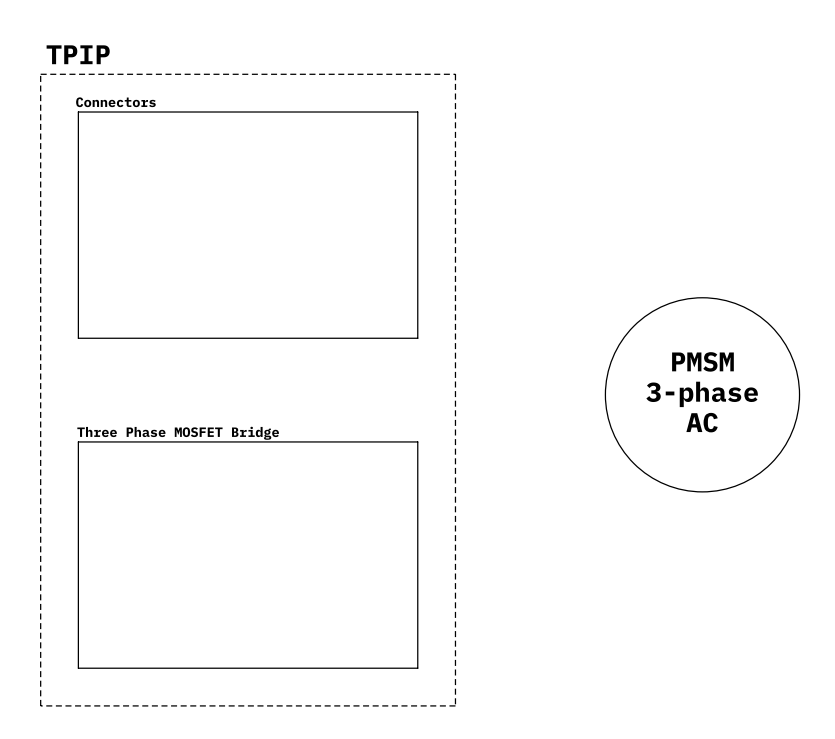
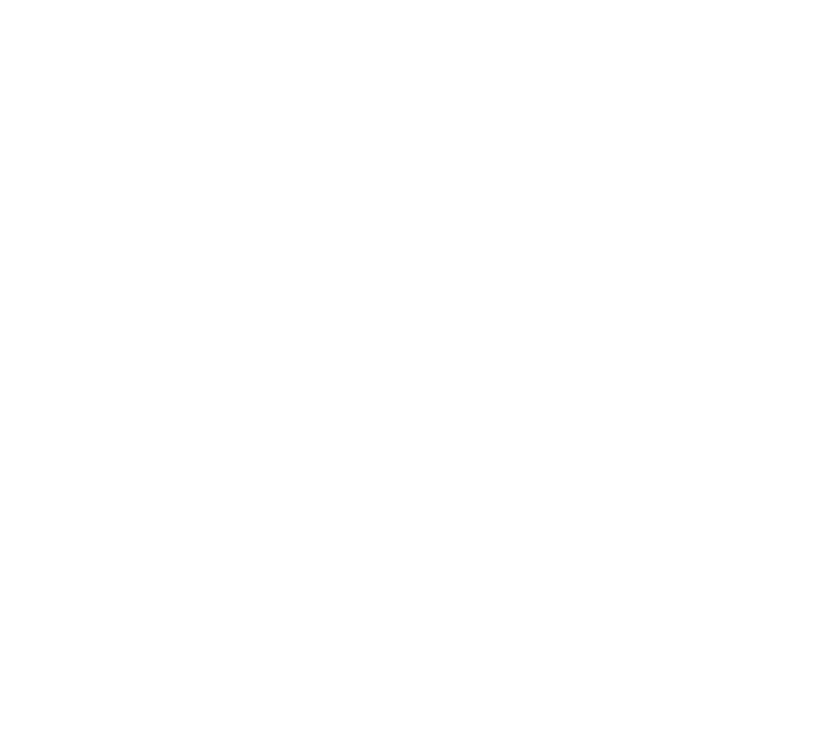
text: TPIP (78, 54) -> none
line: (40, 74) (455, 74) (455, 705) (40, 705) (40, 74) -> none
text: Connectors (115, 102) -> none
line: (78, 112) (78, 338) (417, 338) (417, 112) (78, 112) -> none
drawing: [605, 297, 800, 492] -> none
text: PMSM (702, 361) -> none
text: 3-phase (702, 394) -> none
text: AC (702, 422) -> none
text: Three Phase MOSFET Bridge (178, 433) -> none
line: (78, 441) (417, 441) (417, 668) (78, 668) (78, 441) -> none

